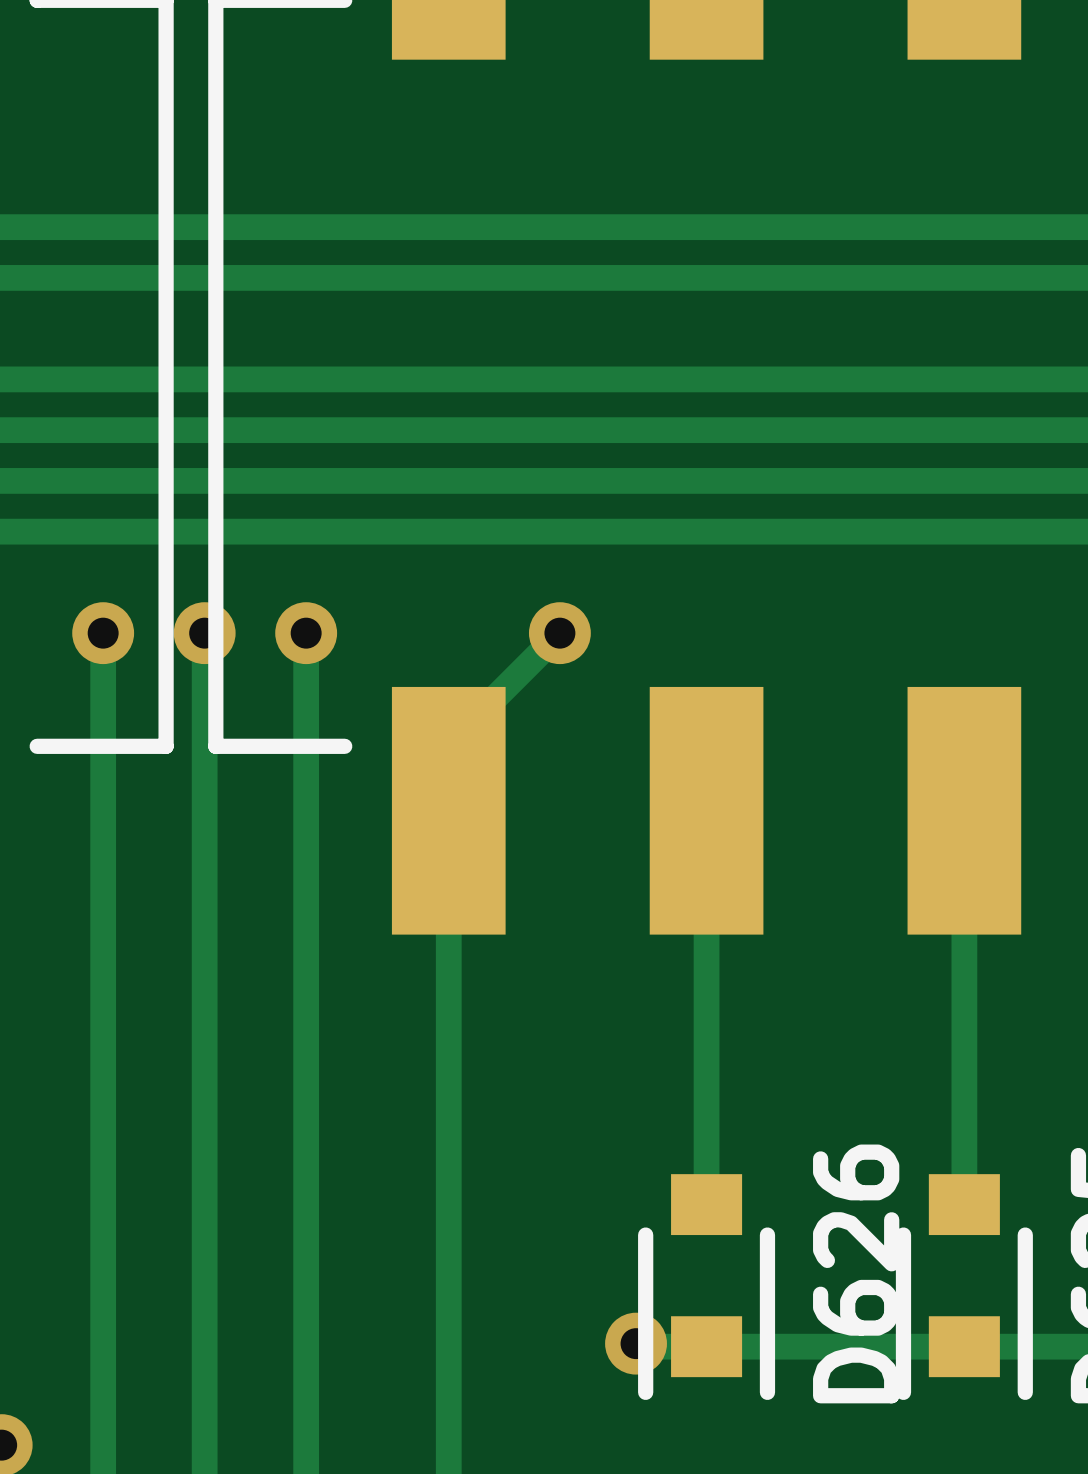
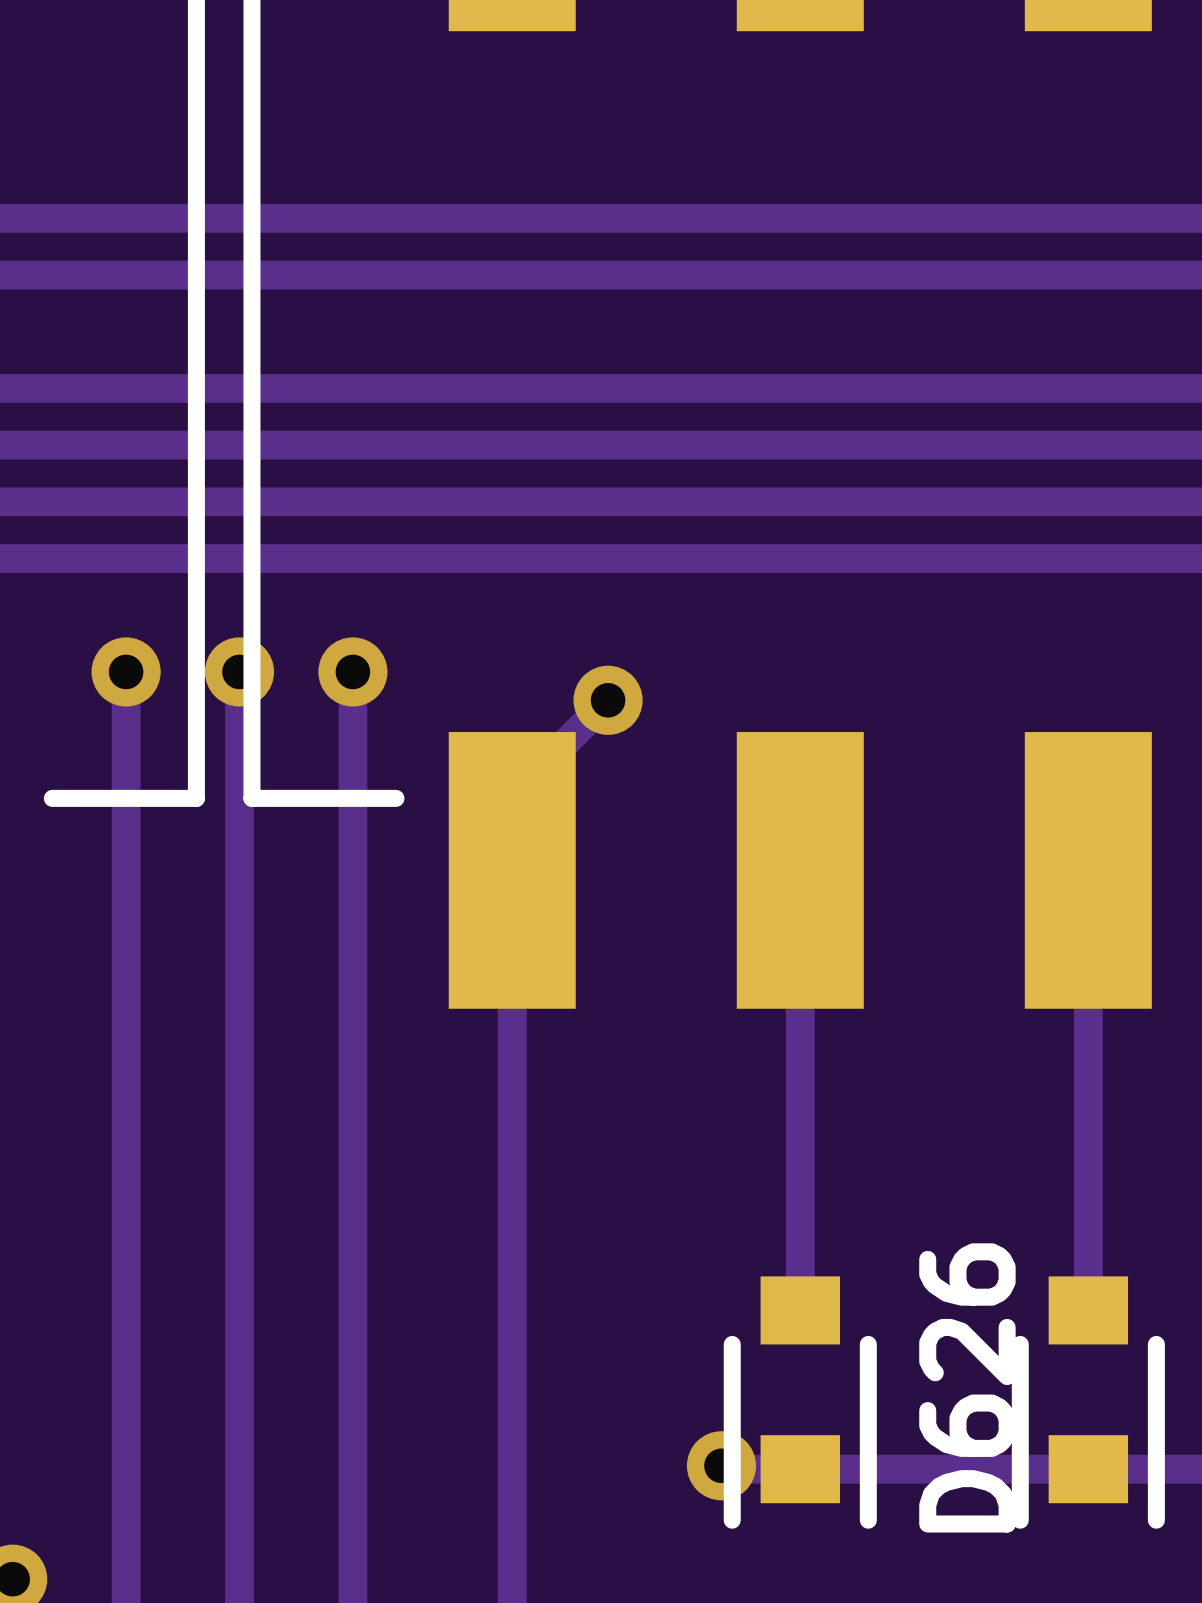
via position: (559, 633) -> (608, 700)

